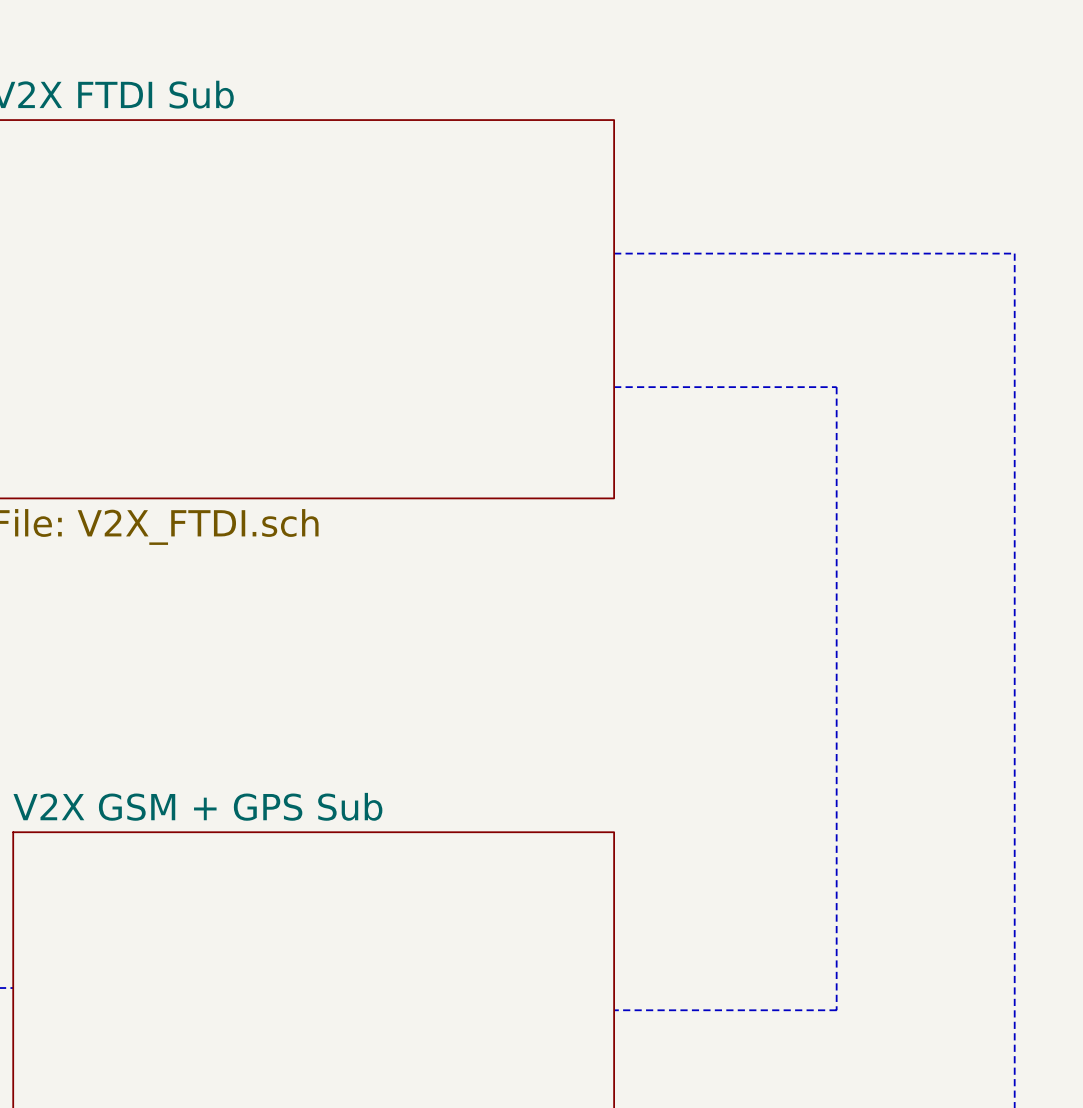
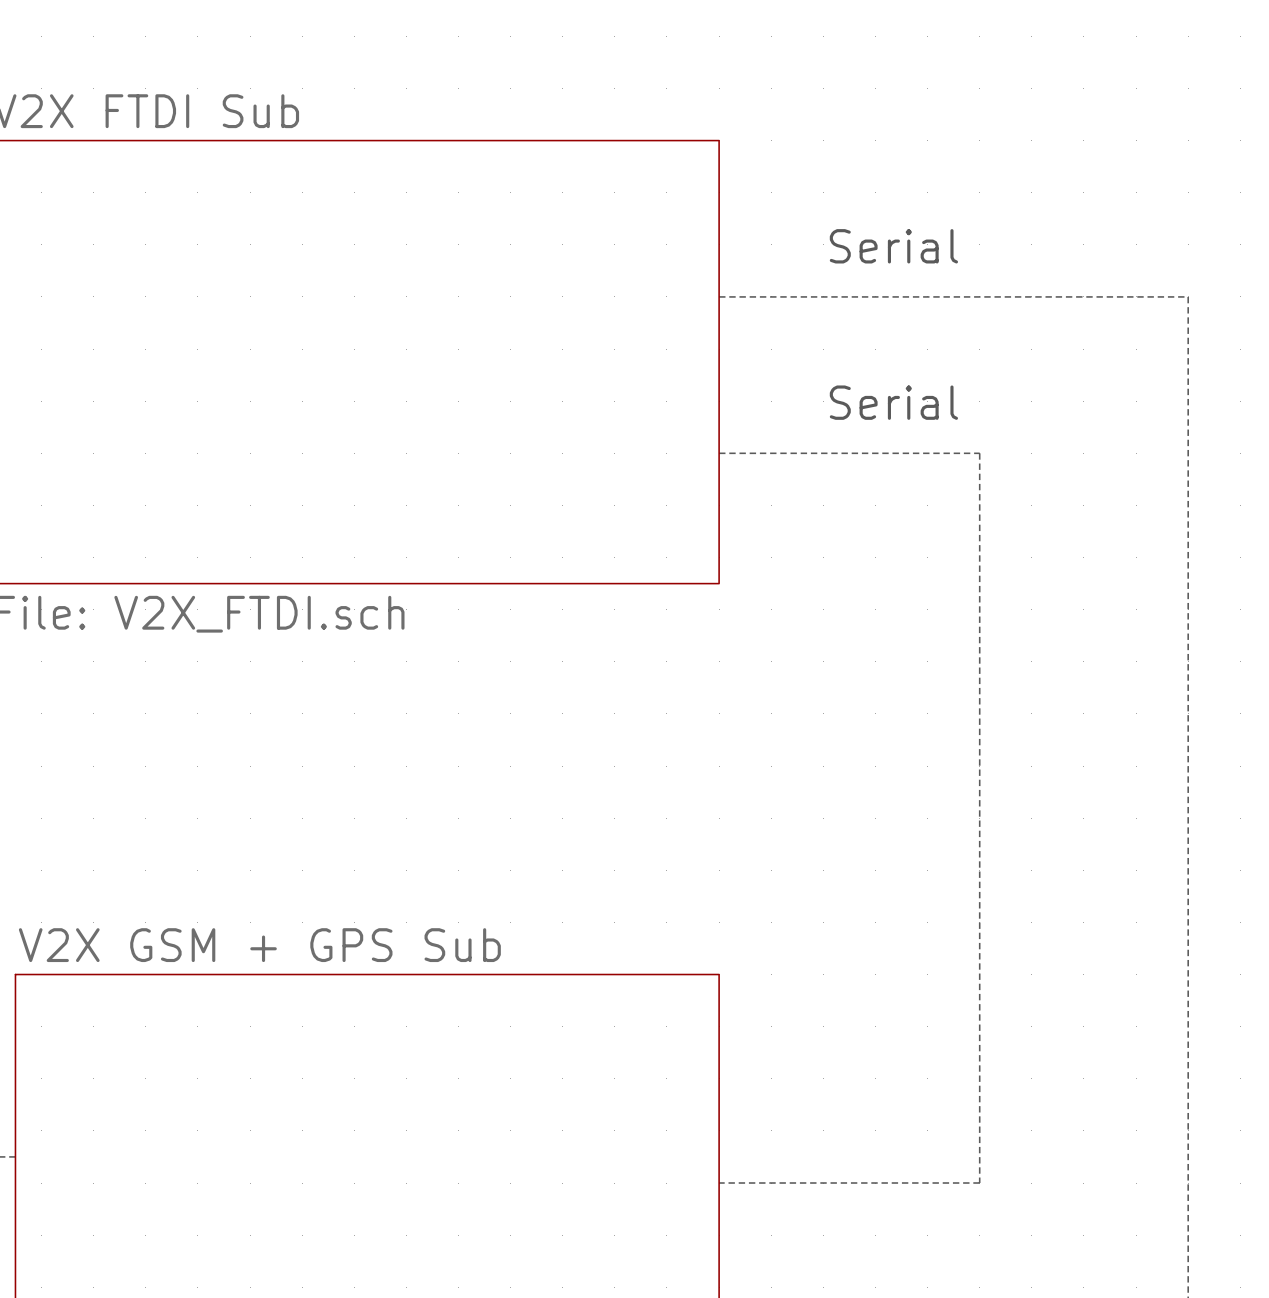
text: none -> Serial (893, 246)
text: none -> Serial (893, 402)

